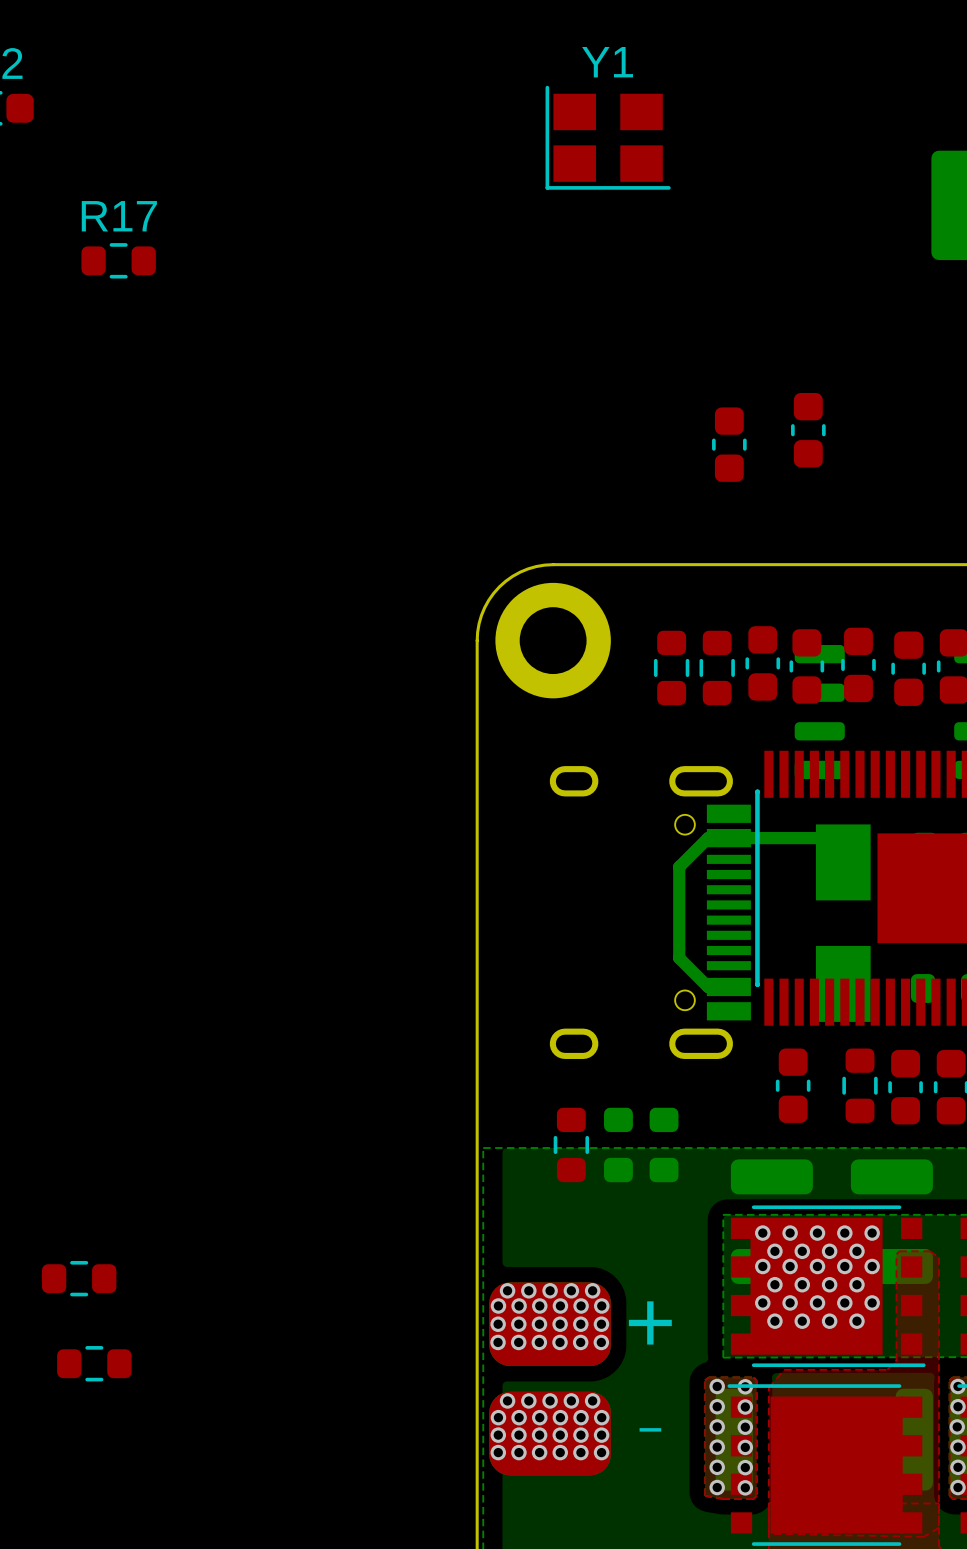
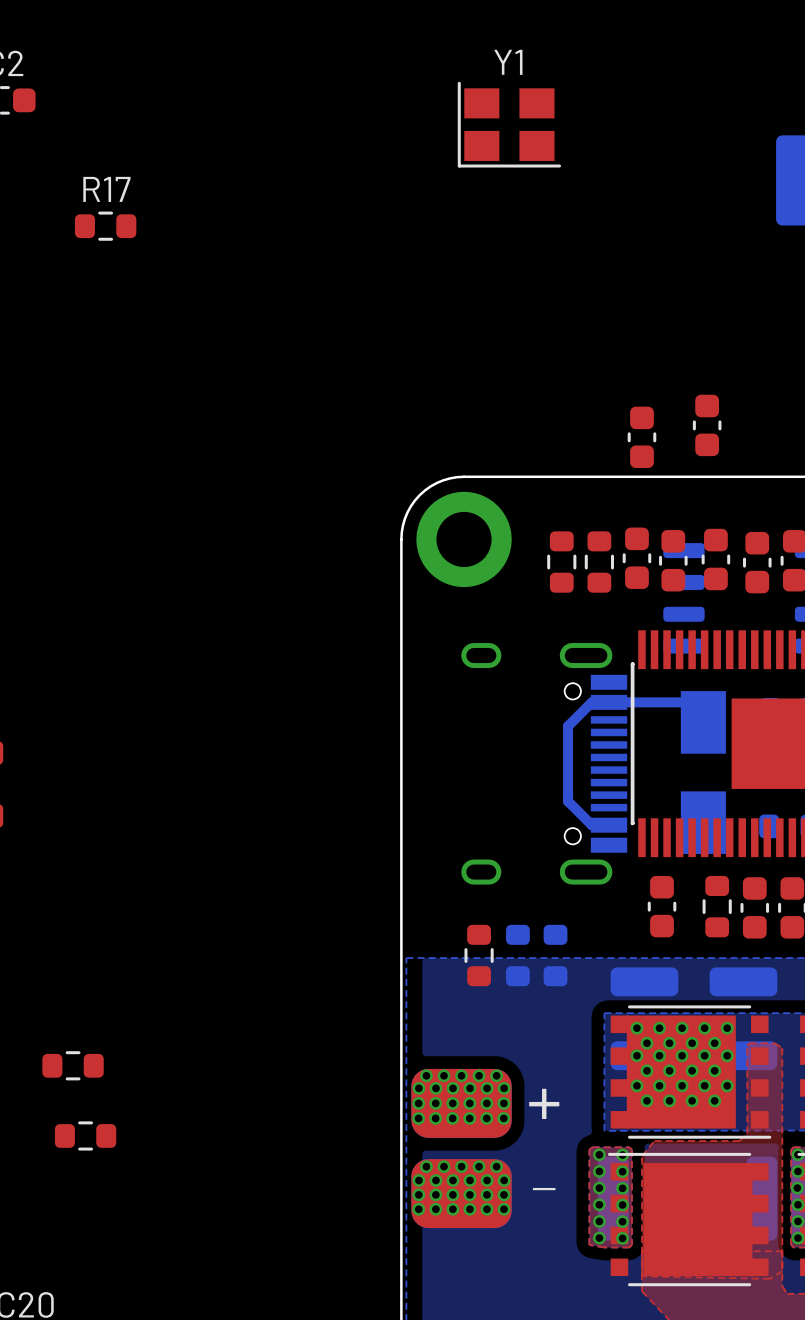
part: (808, 430) -> none
part: (729, 444) -> none
part: none -> (707, 425)
part: none -> (641, 437)

